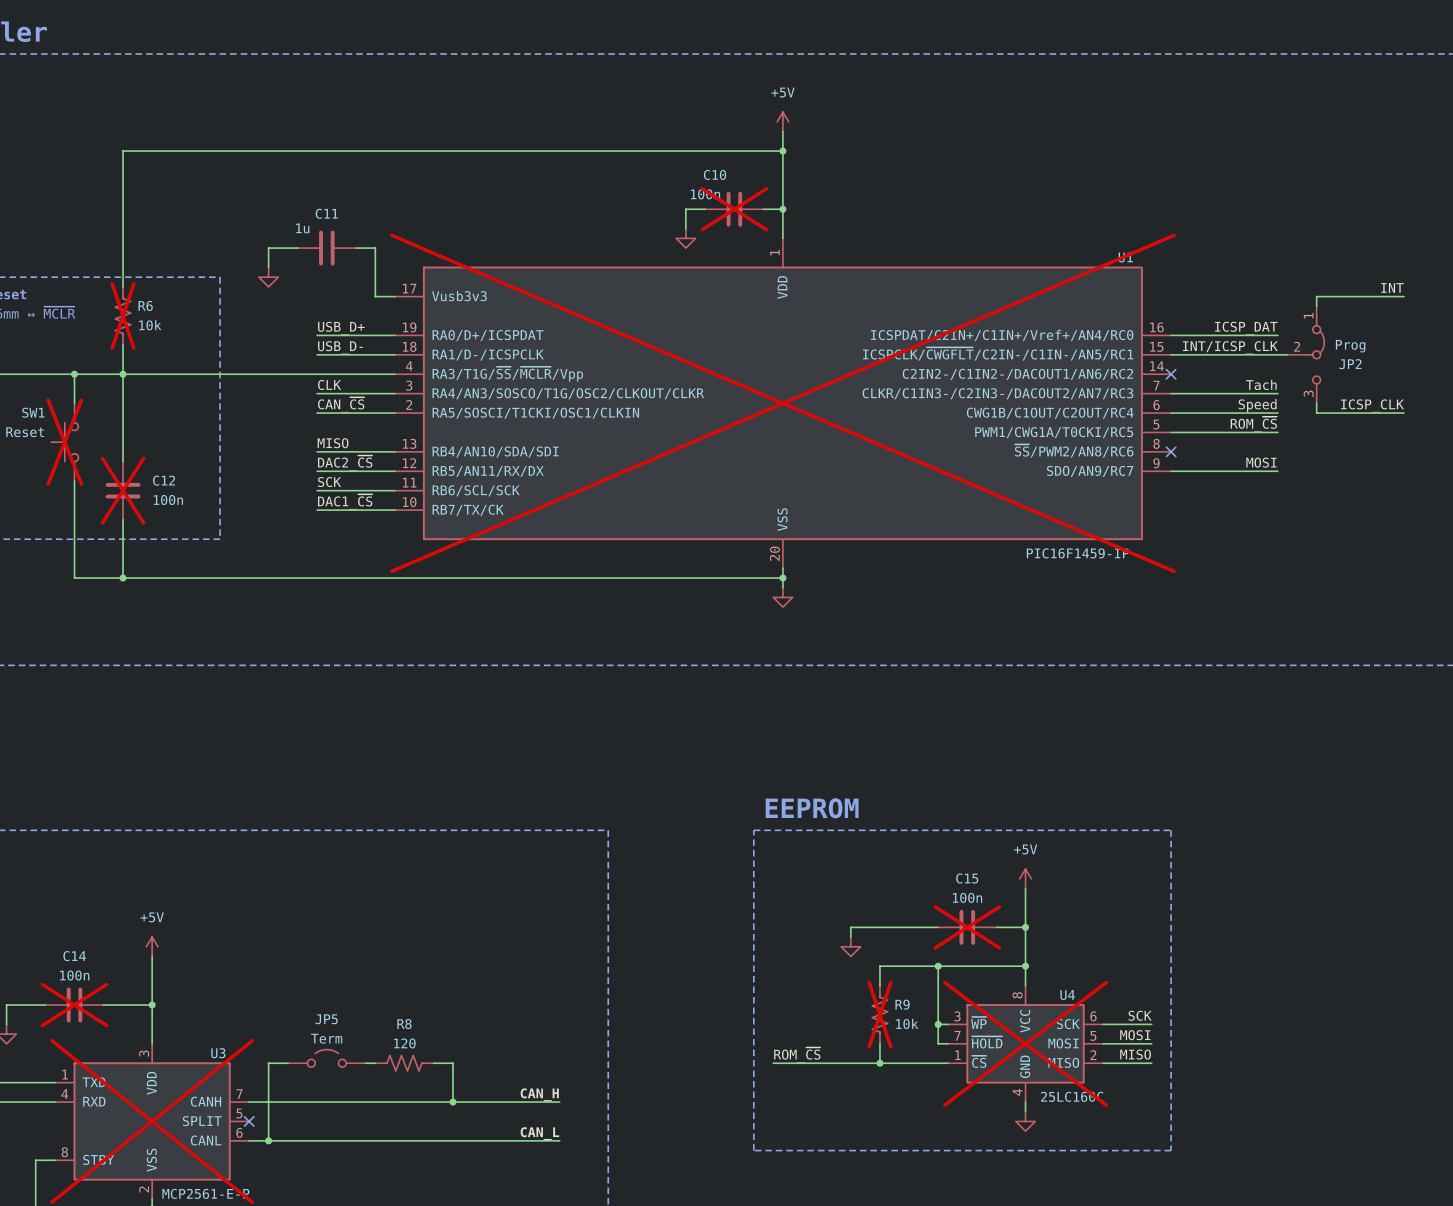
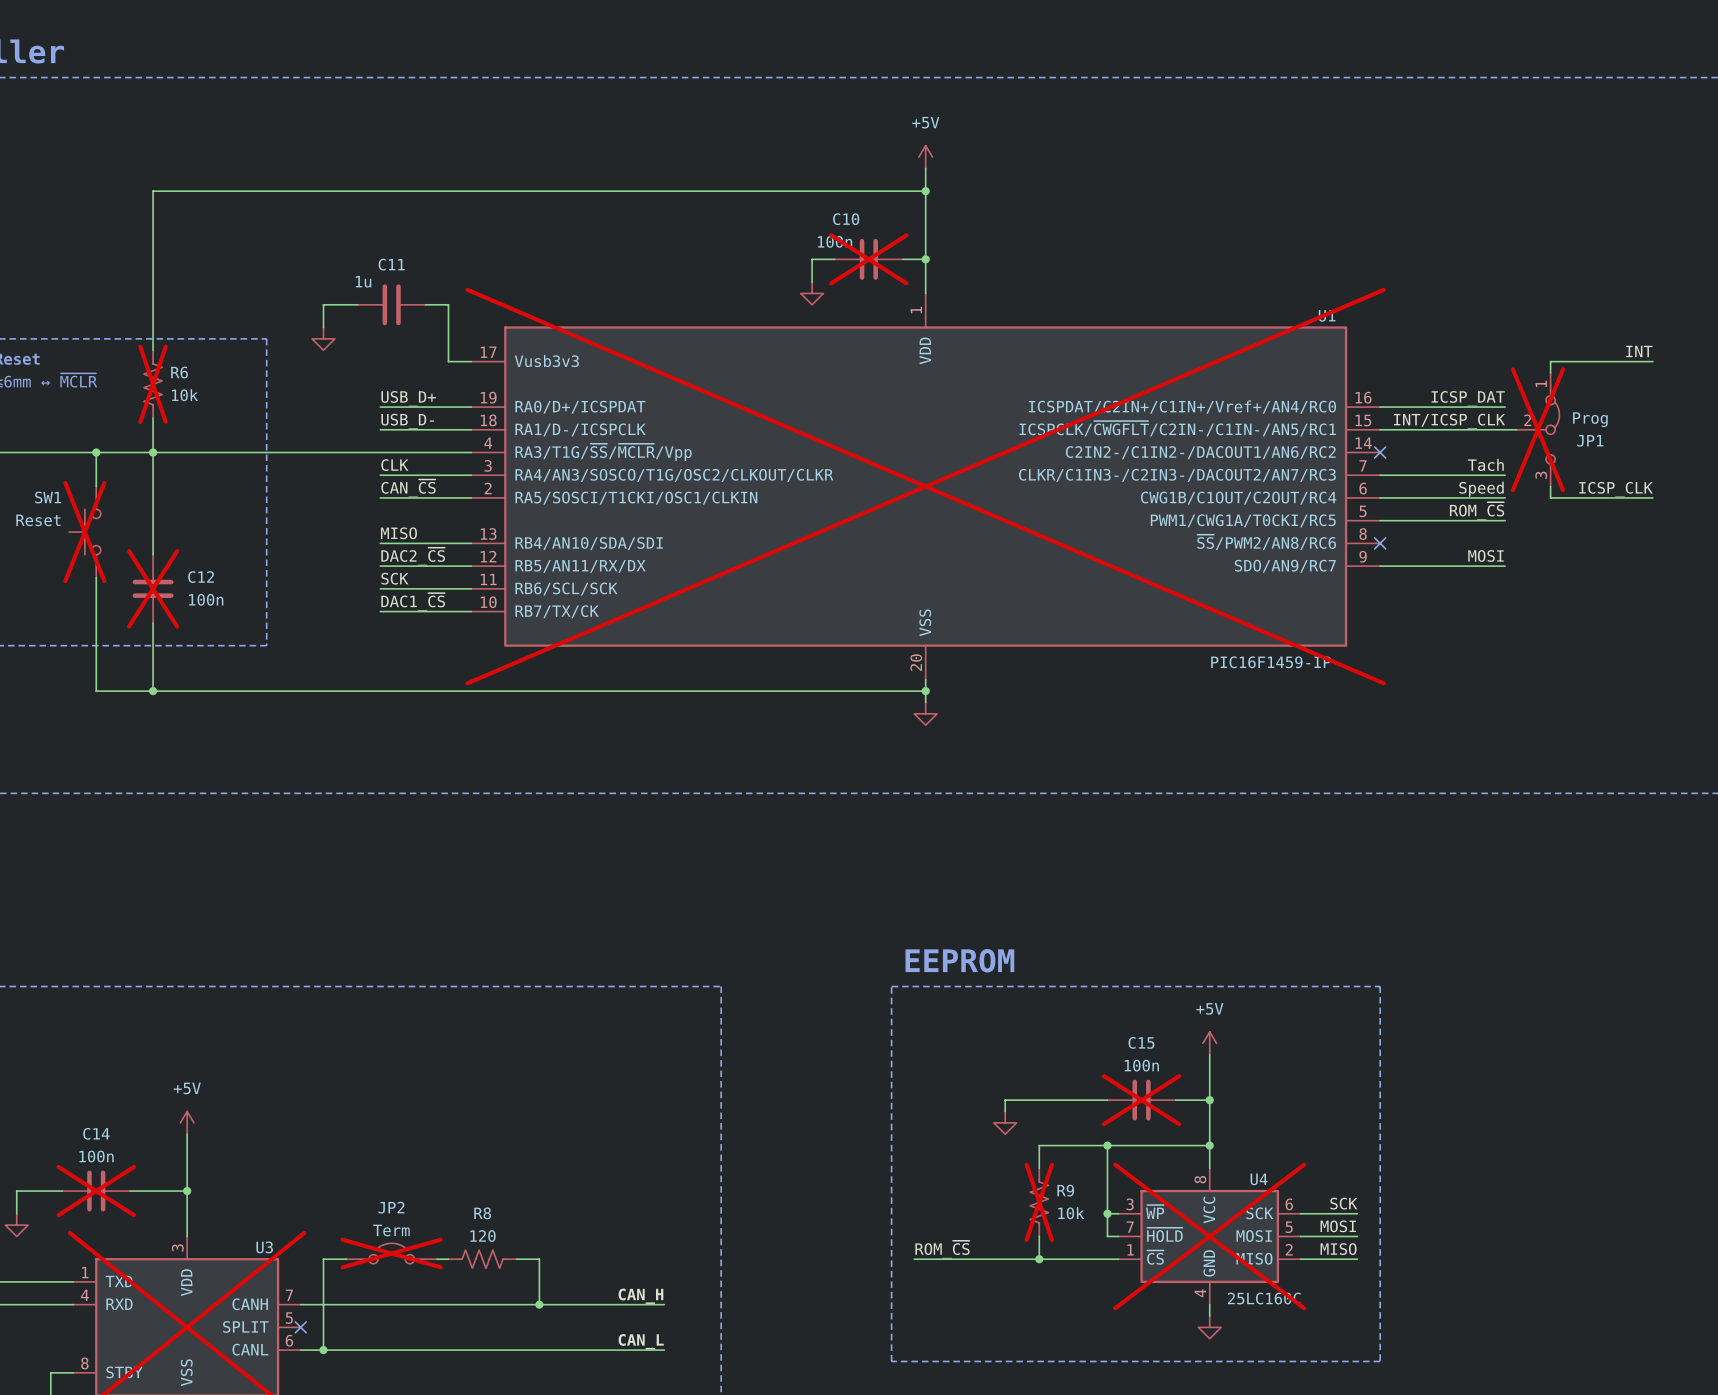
JP2 do-not-place cross: none -> (1537, 429)
JP2 name: JP2 (1350, 364) -> JP1 (1590, 440)
JP5 name: JP5 (326, 1019) -> JP2 (391, 1207)
JP5 do-not-place cross: none -> (391, 1253)

